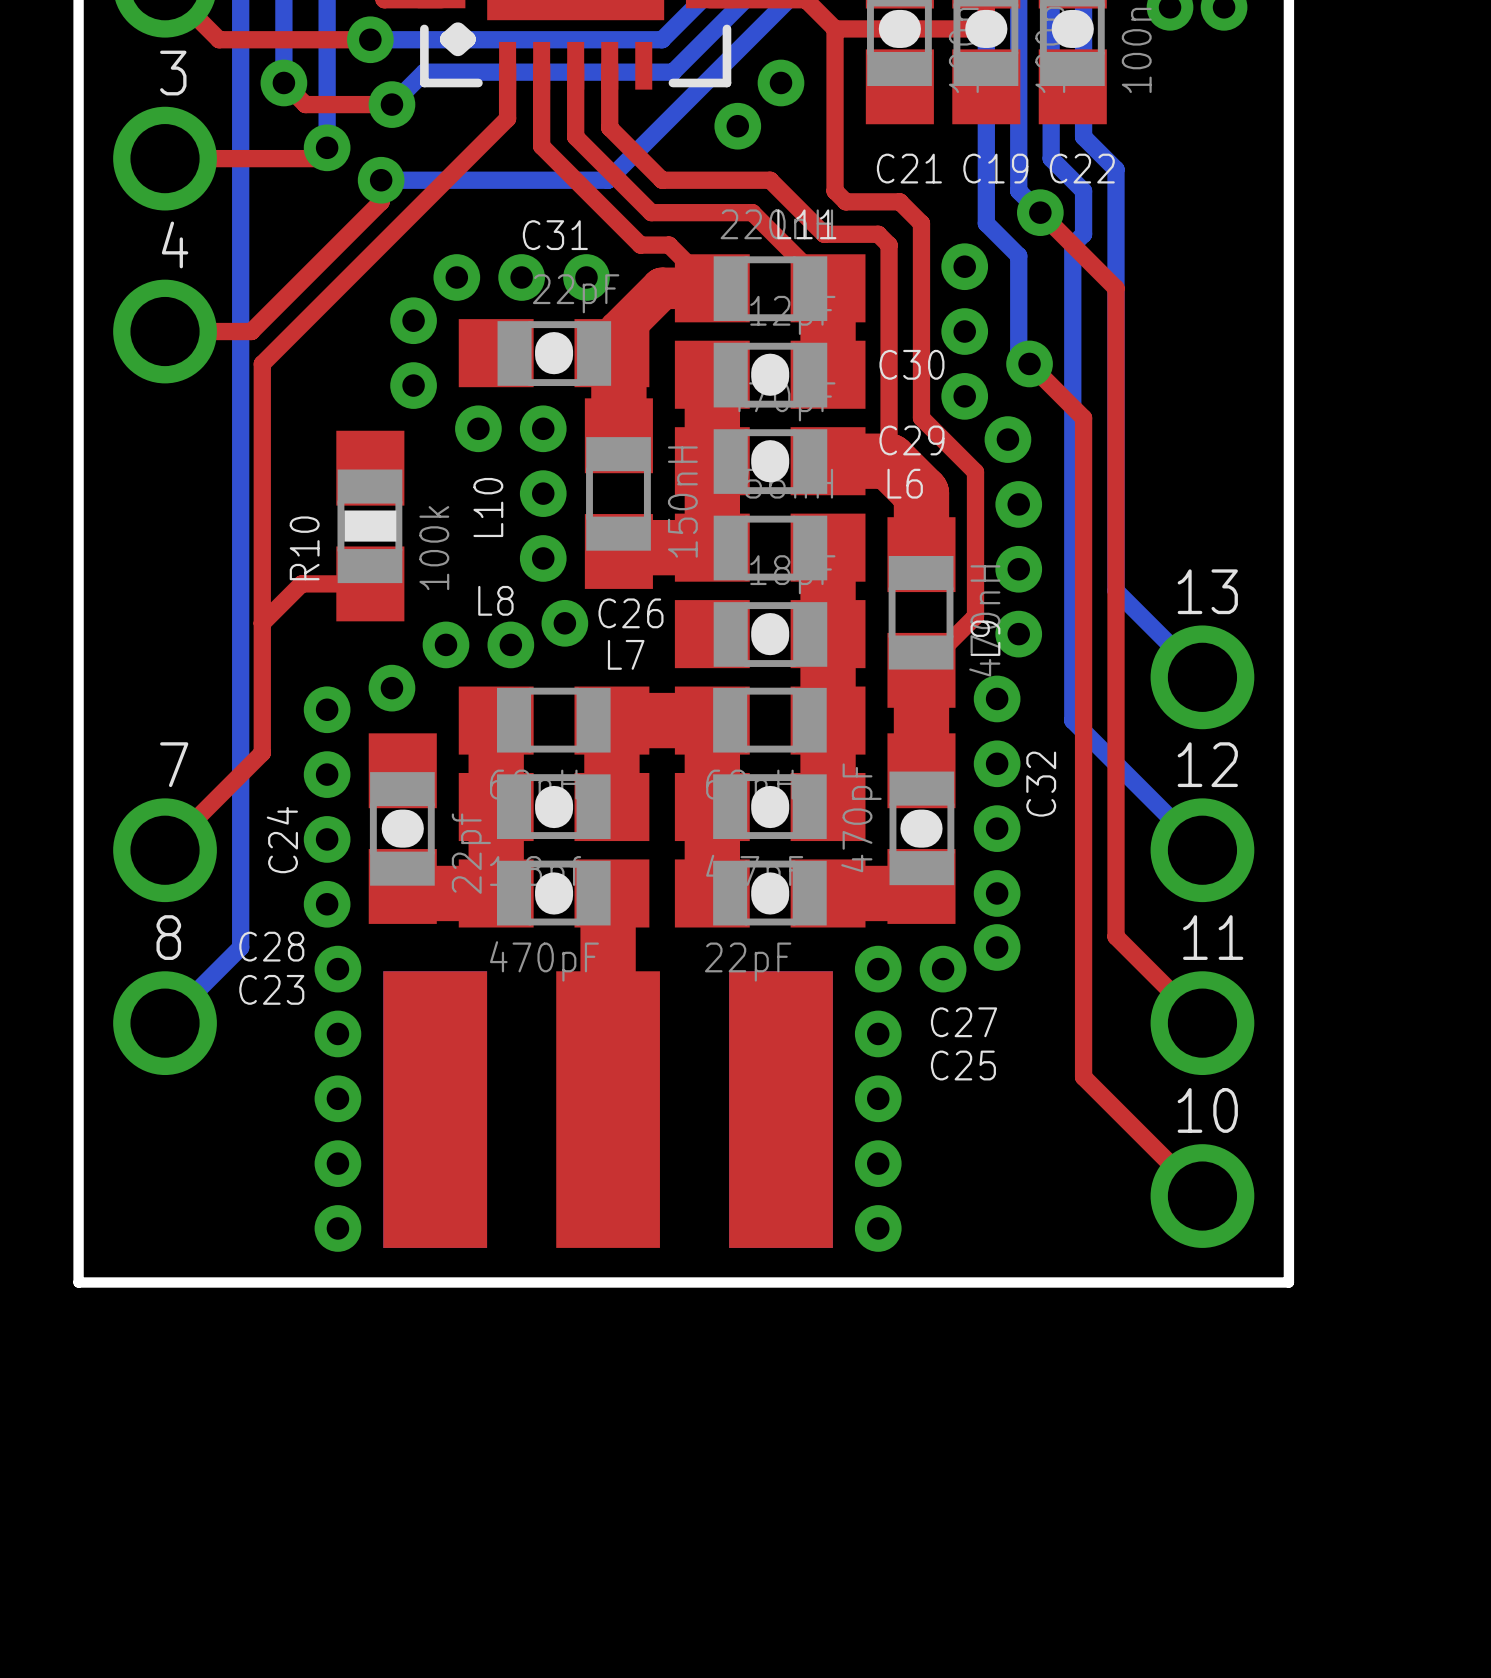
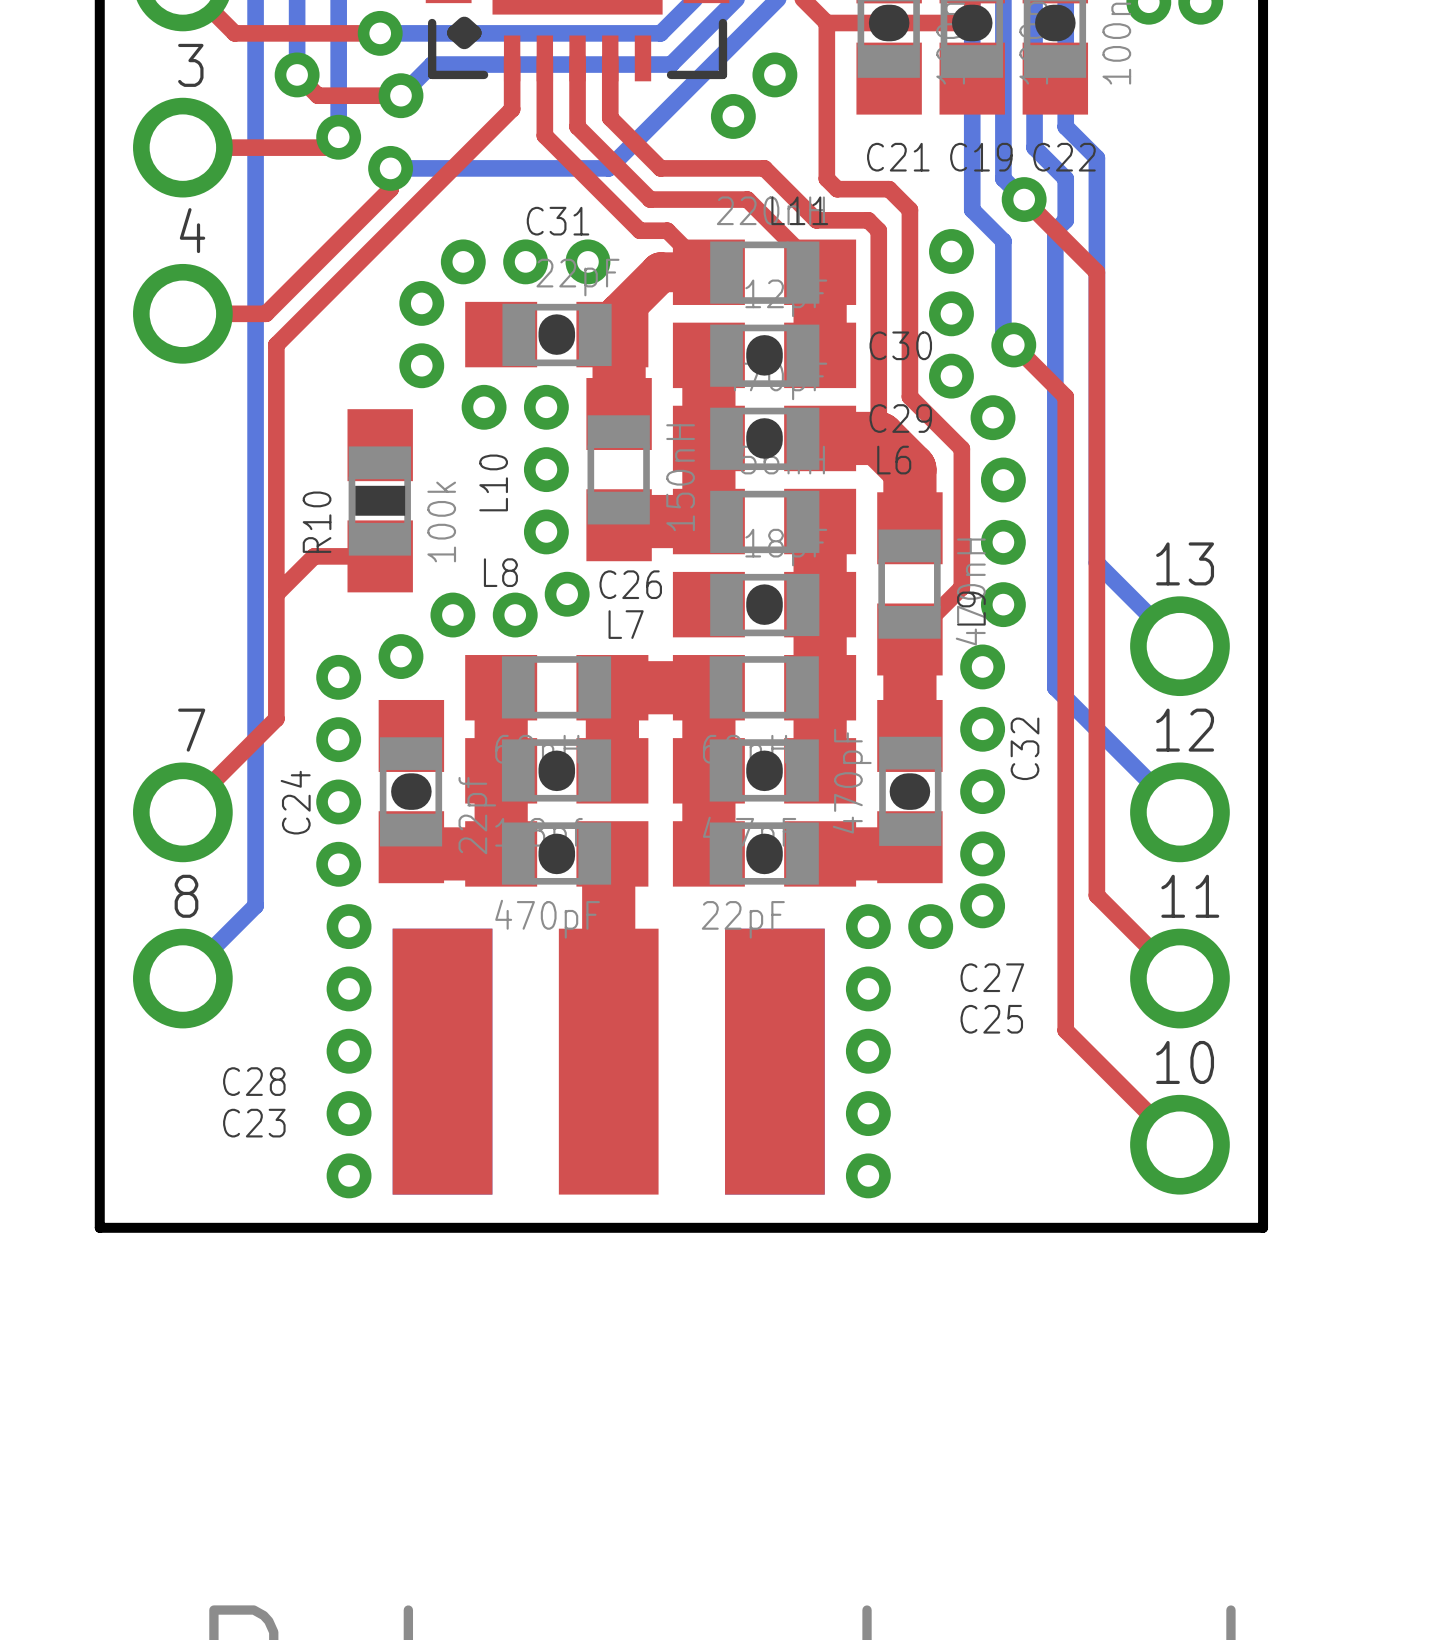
C28 name position: C28 (271, 946) -> C28 (254, 1081)
C23 name position: C23 (271, 989) -> C23 (254, 1123)
C27 name position: C27 (964, 1022) -> C27 (992, 977)
C25 name position: C25 (963, 1065) -> C25 (991, 1019)

